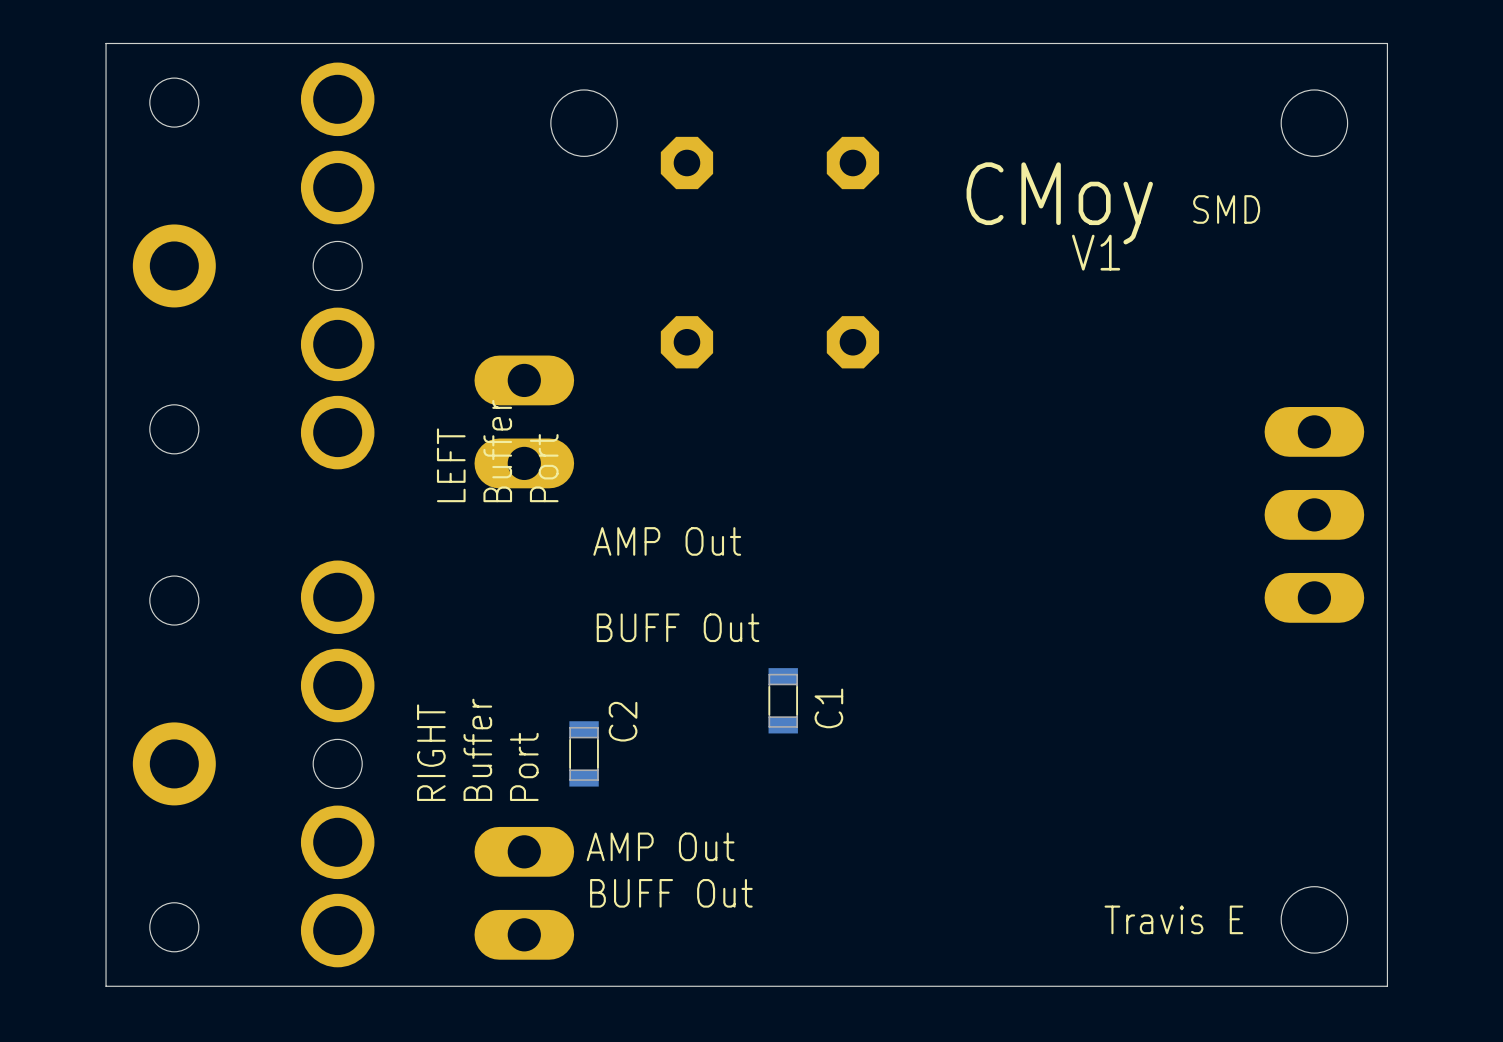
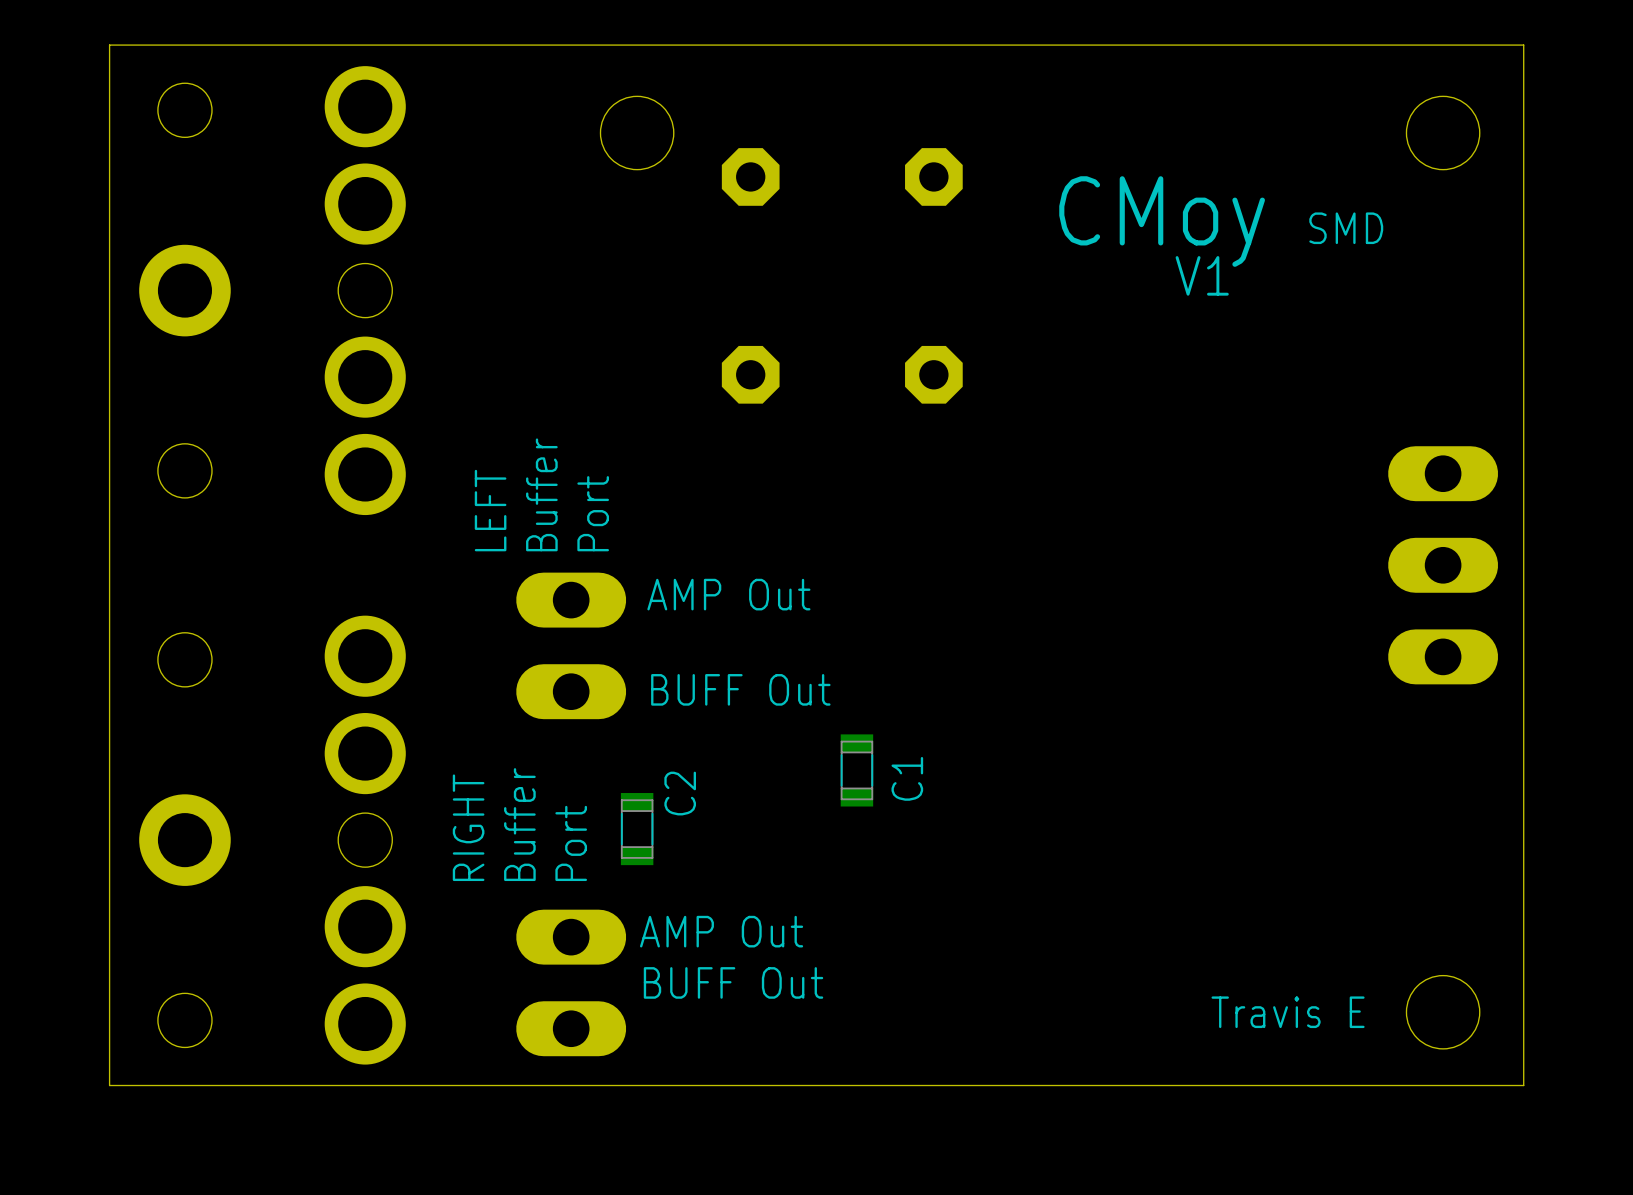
part position: (524, 421) -> (571, 645)

